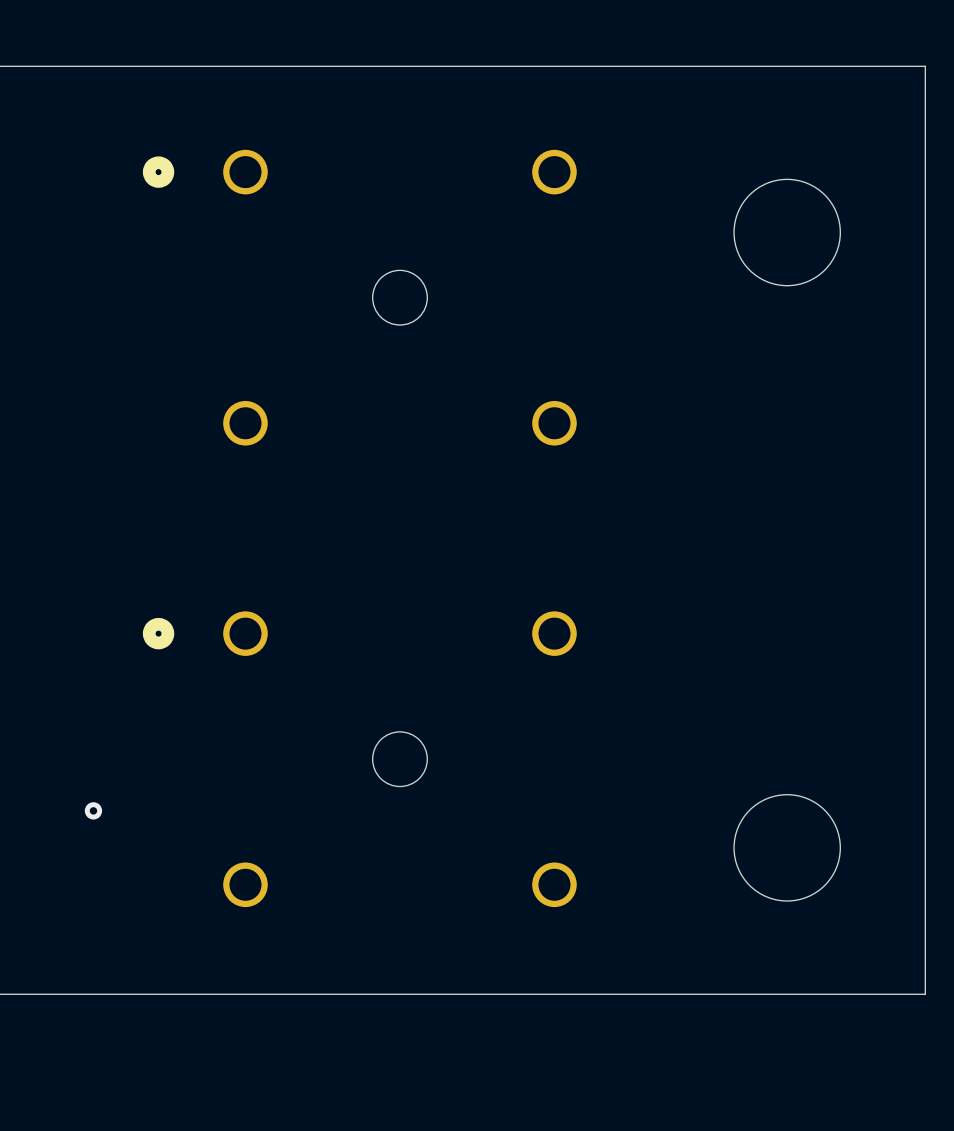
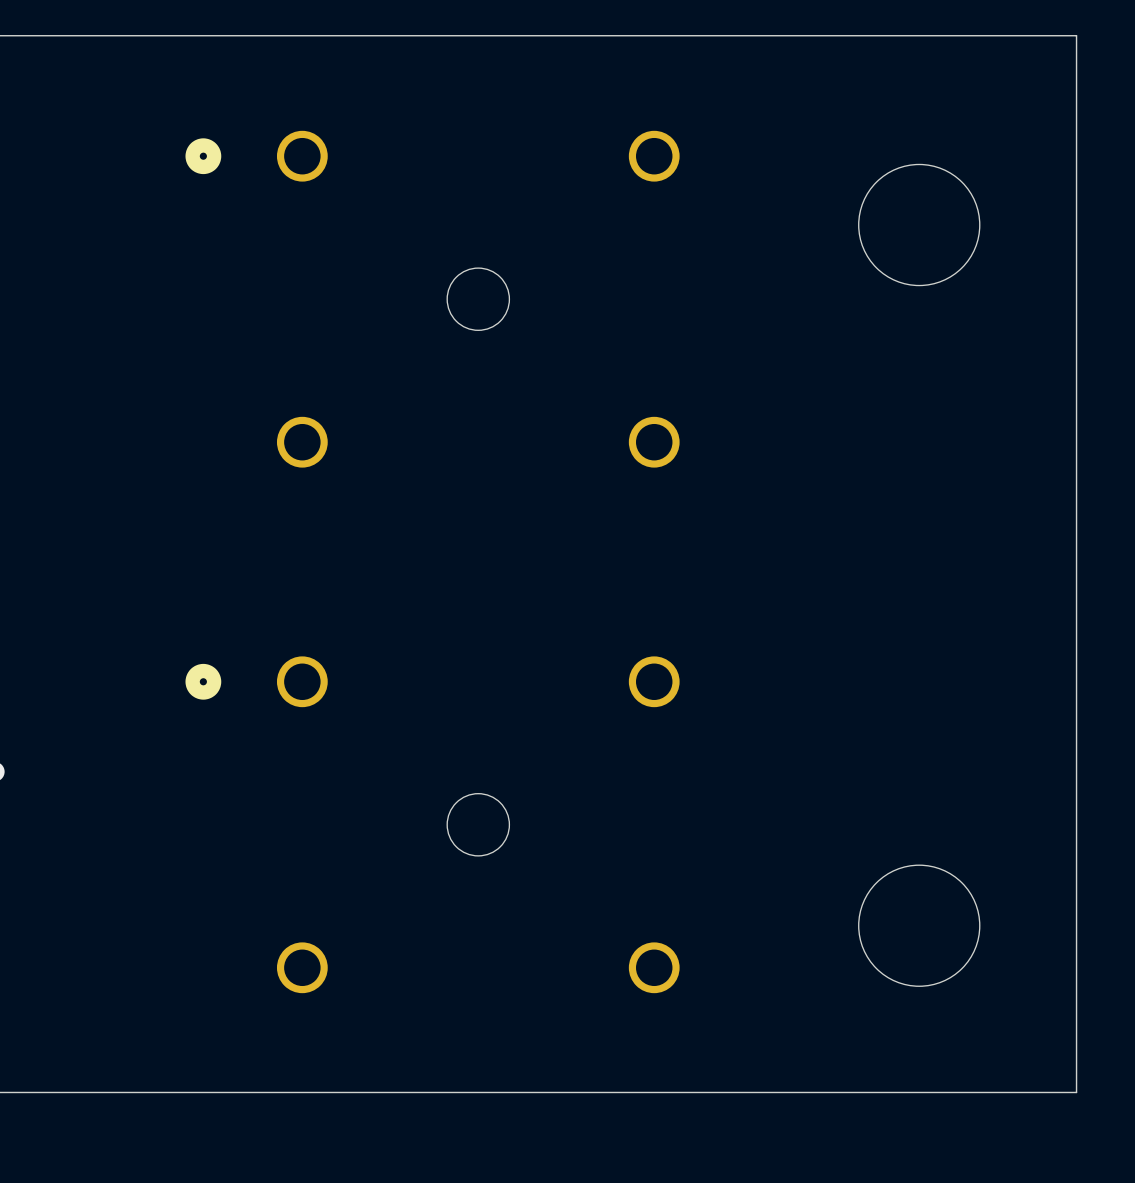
via: (93, 810) -> none

